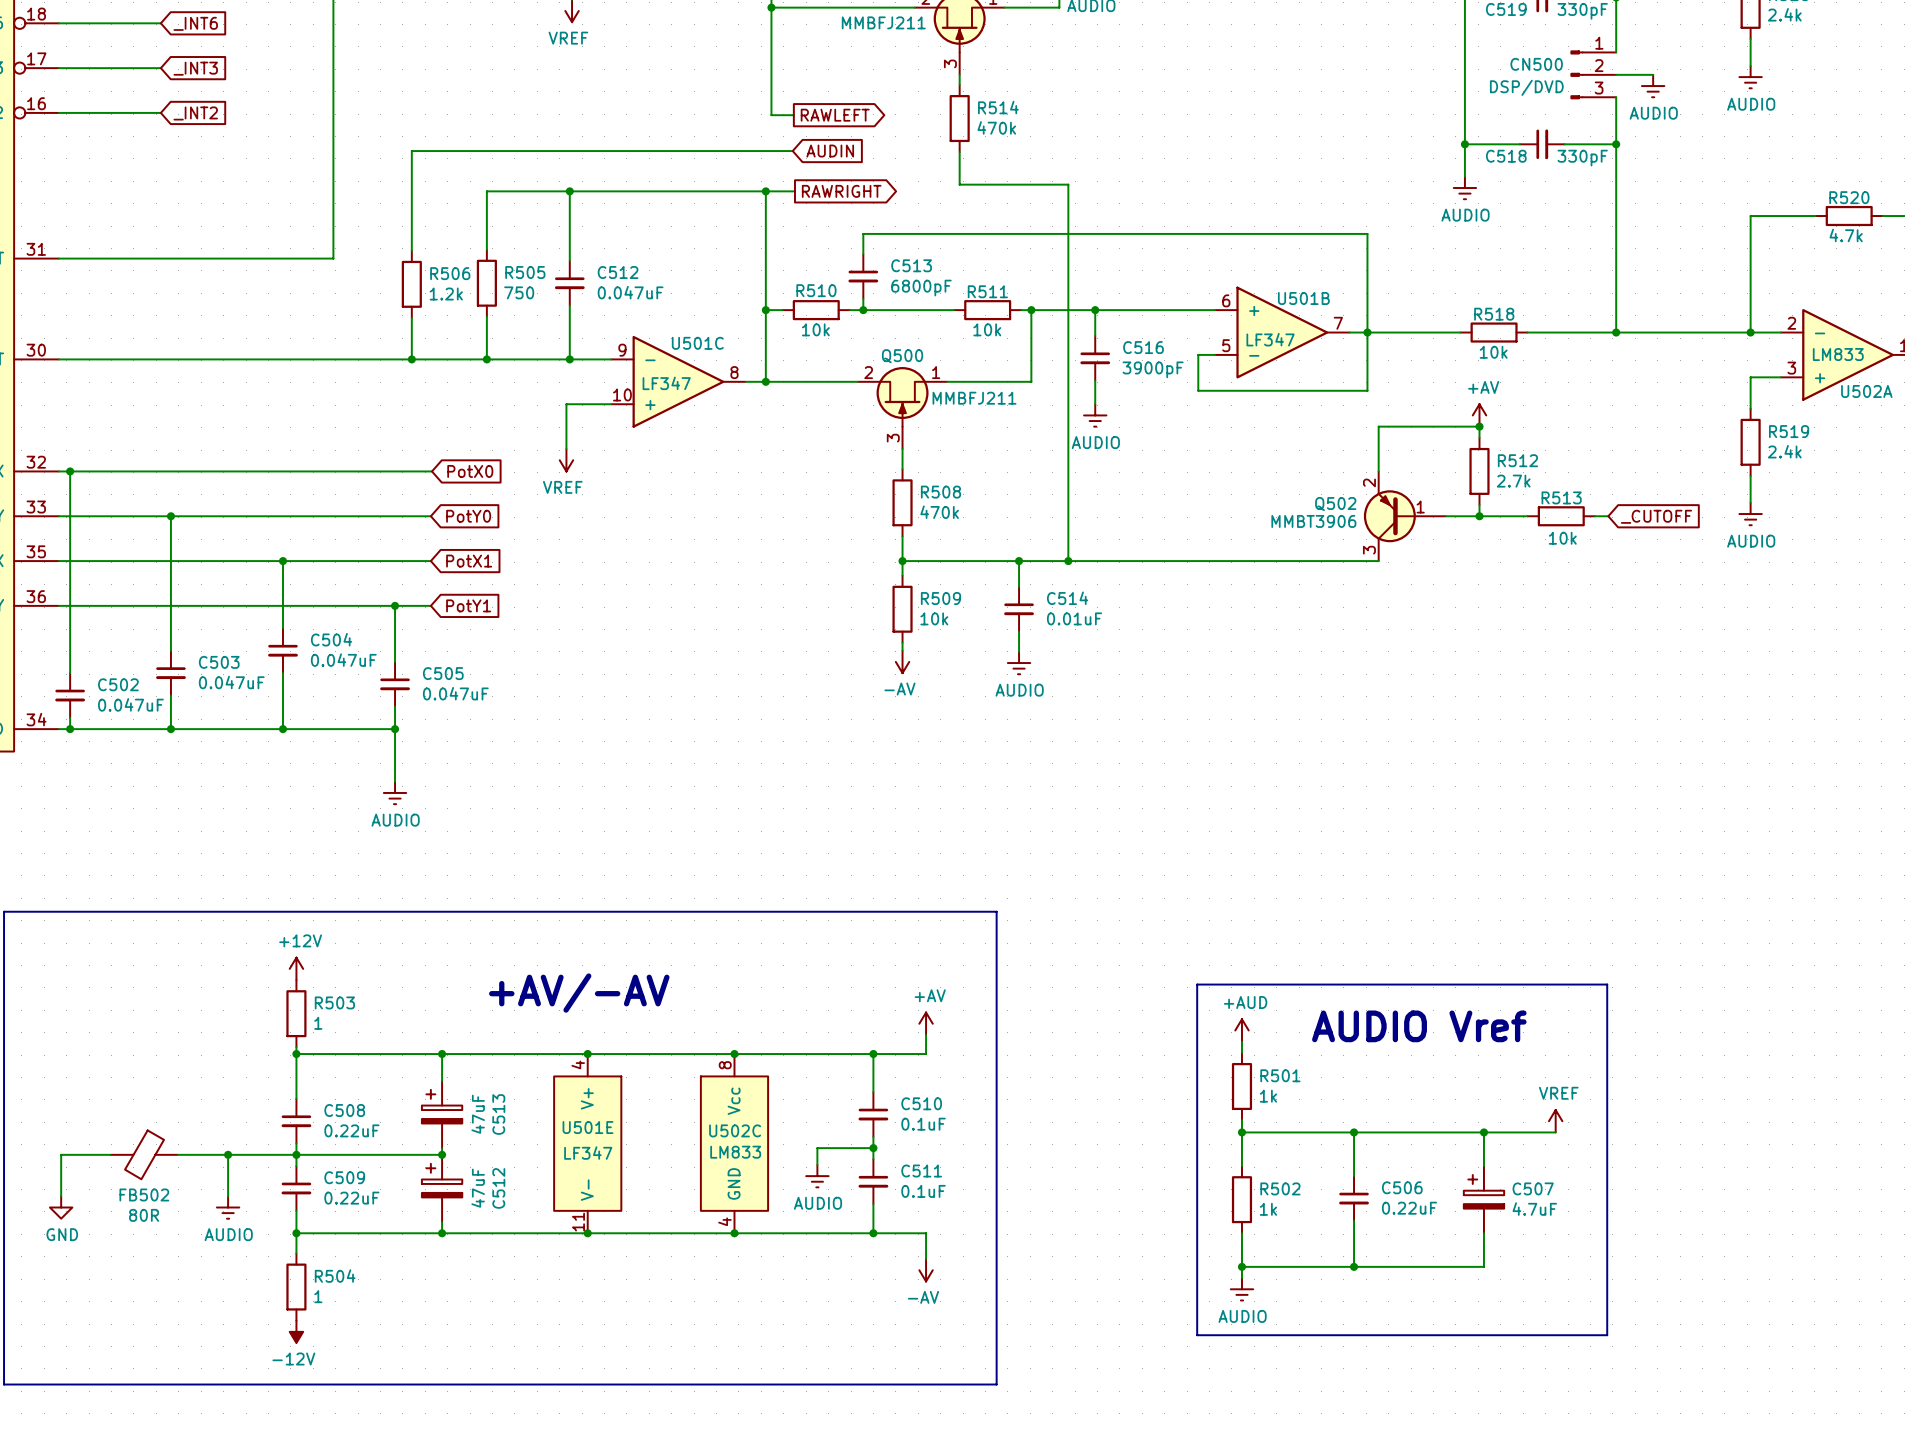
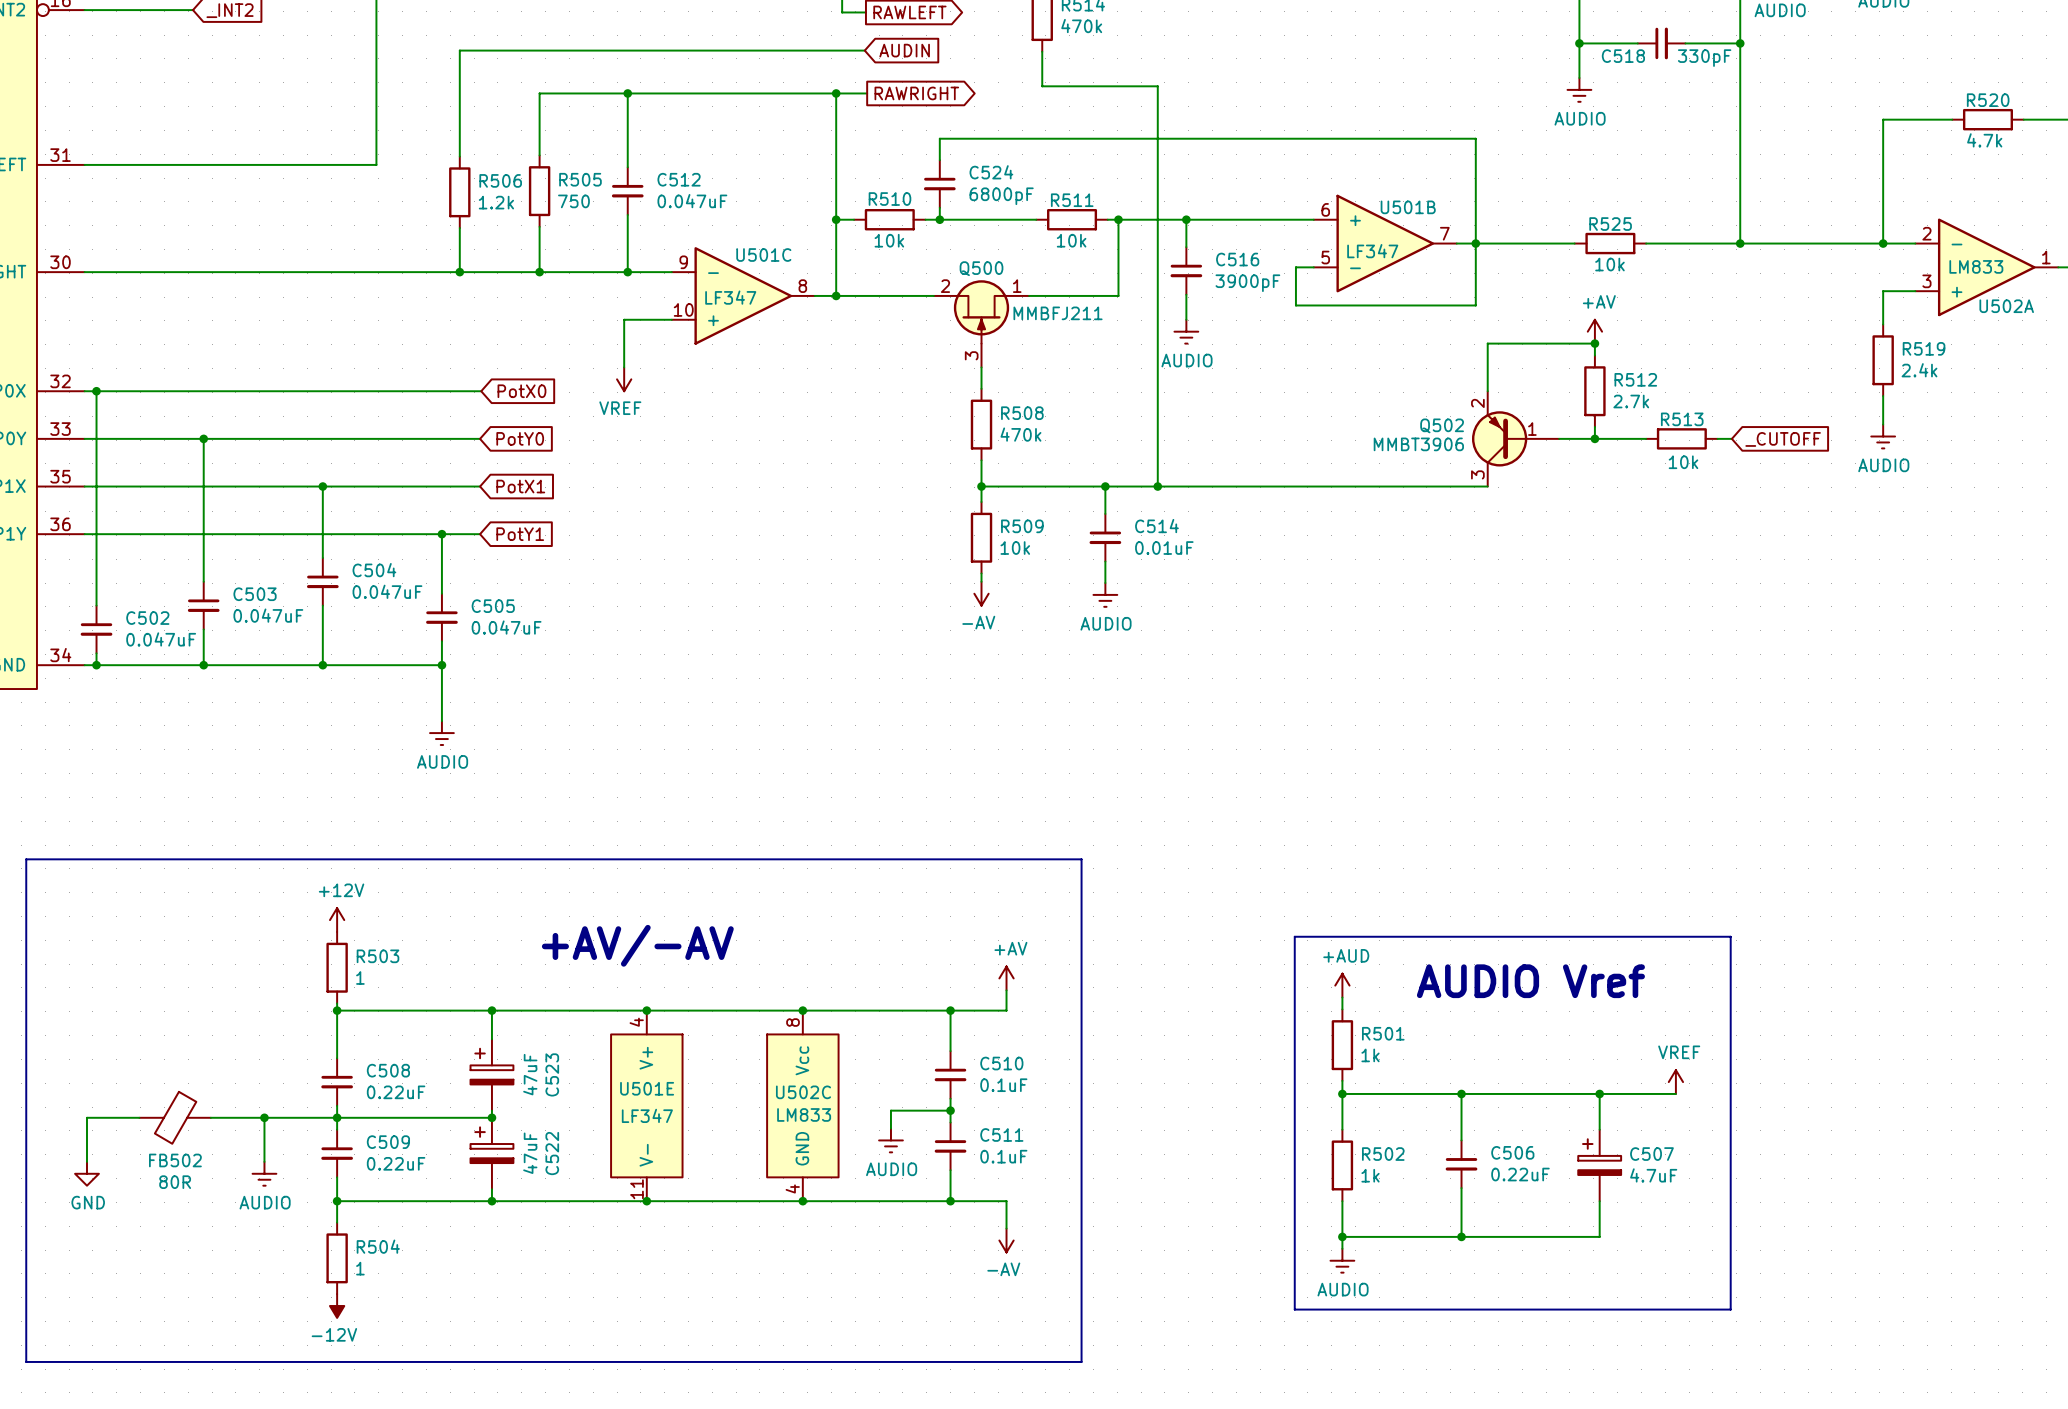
C513 name: C513 (911, 265) -> C524 (991, 172)
R518 name: R518 (1494, 314) -> R525 (1610, 224)
C513 name: C513 (498, 1114) -> C523 (552, 1074)
C512 name: C512 (498, 1188) -> C522 (552, 1153)

